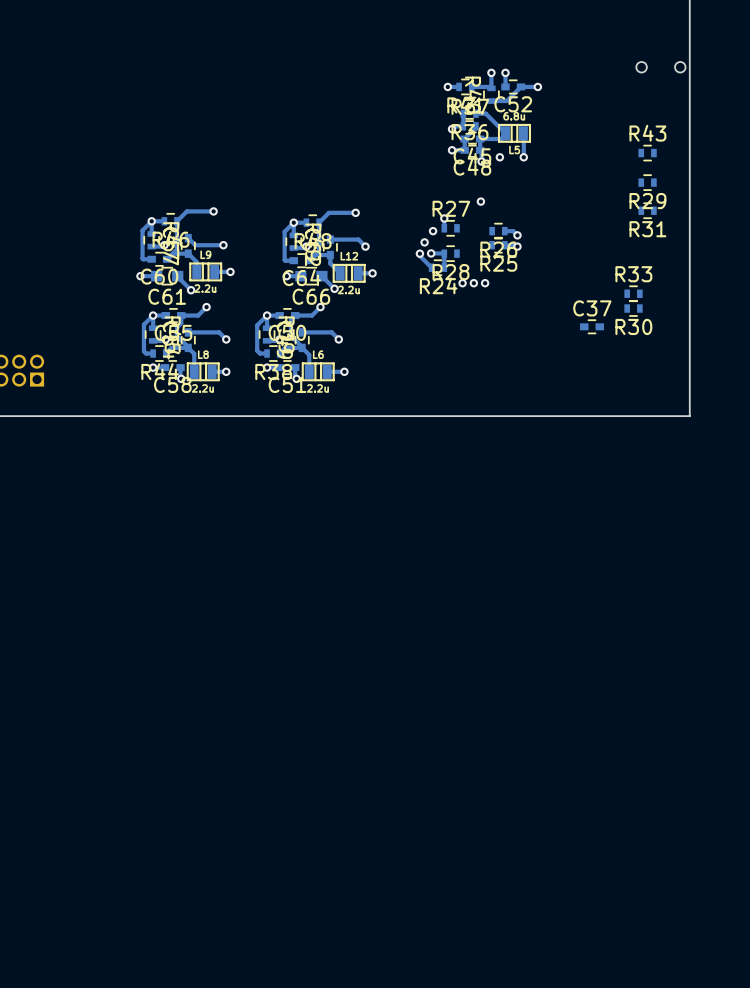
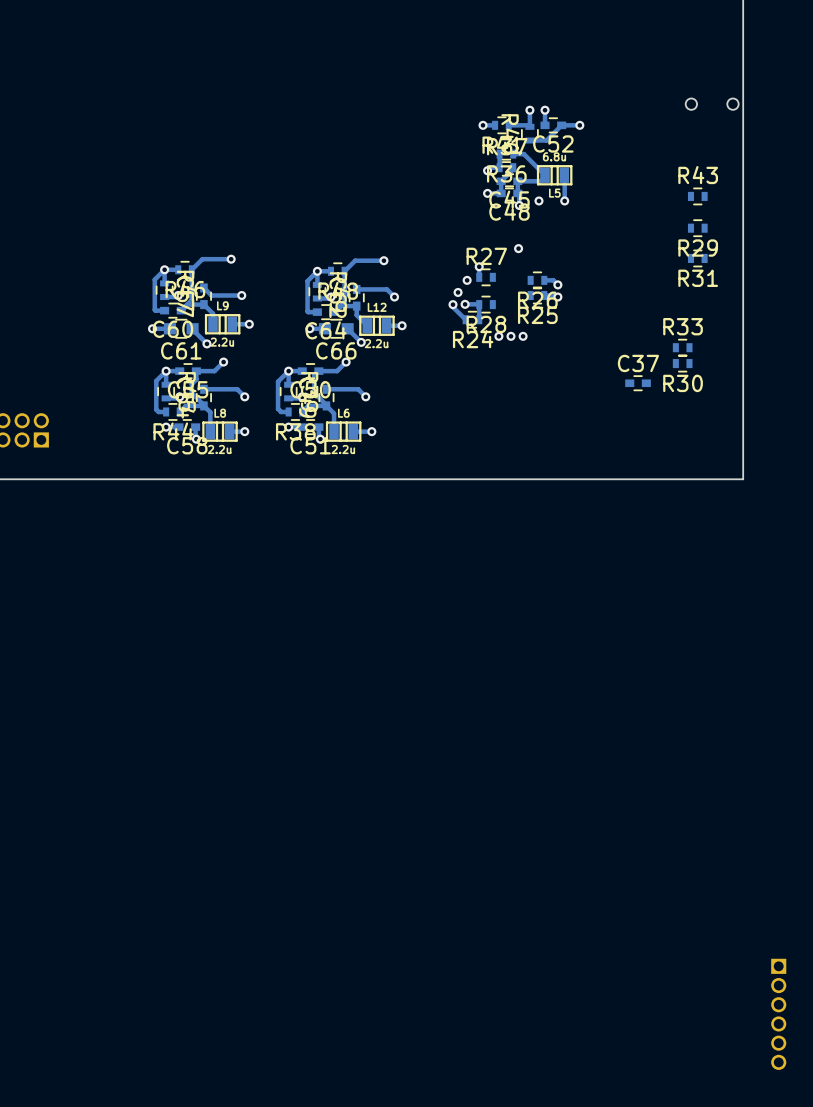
part: none -> (778, 1014)

